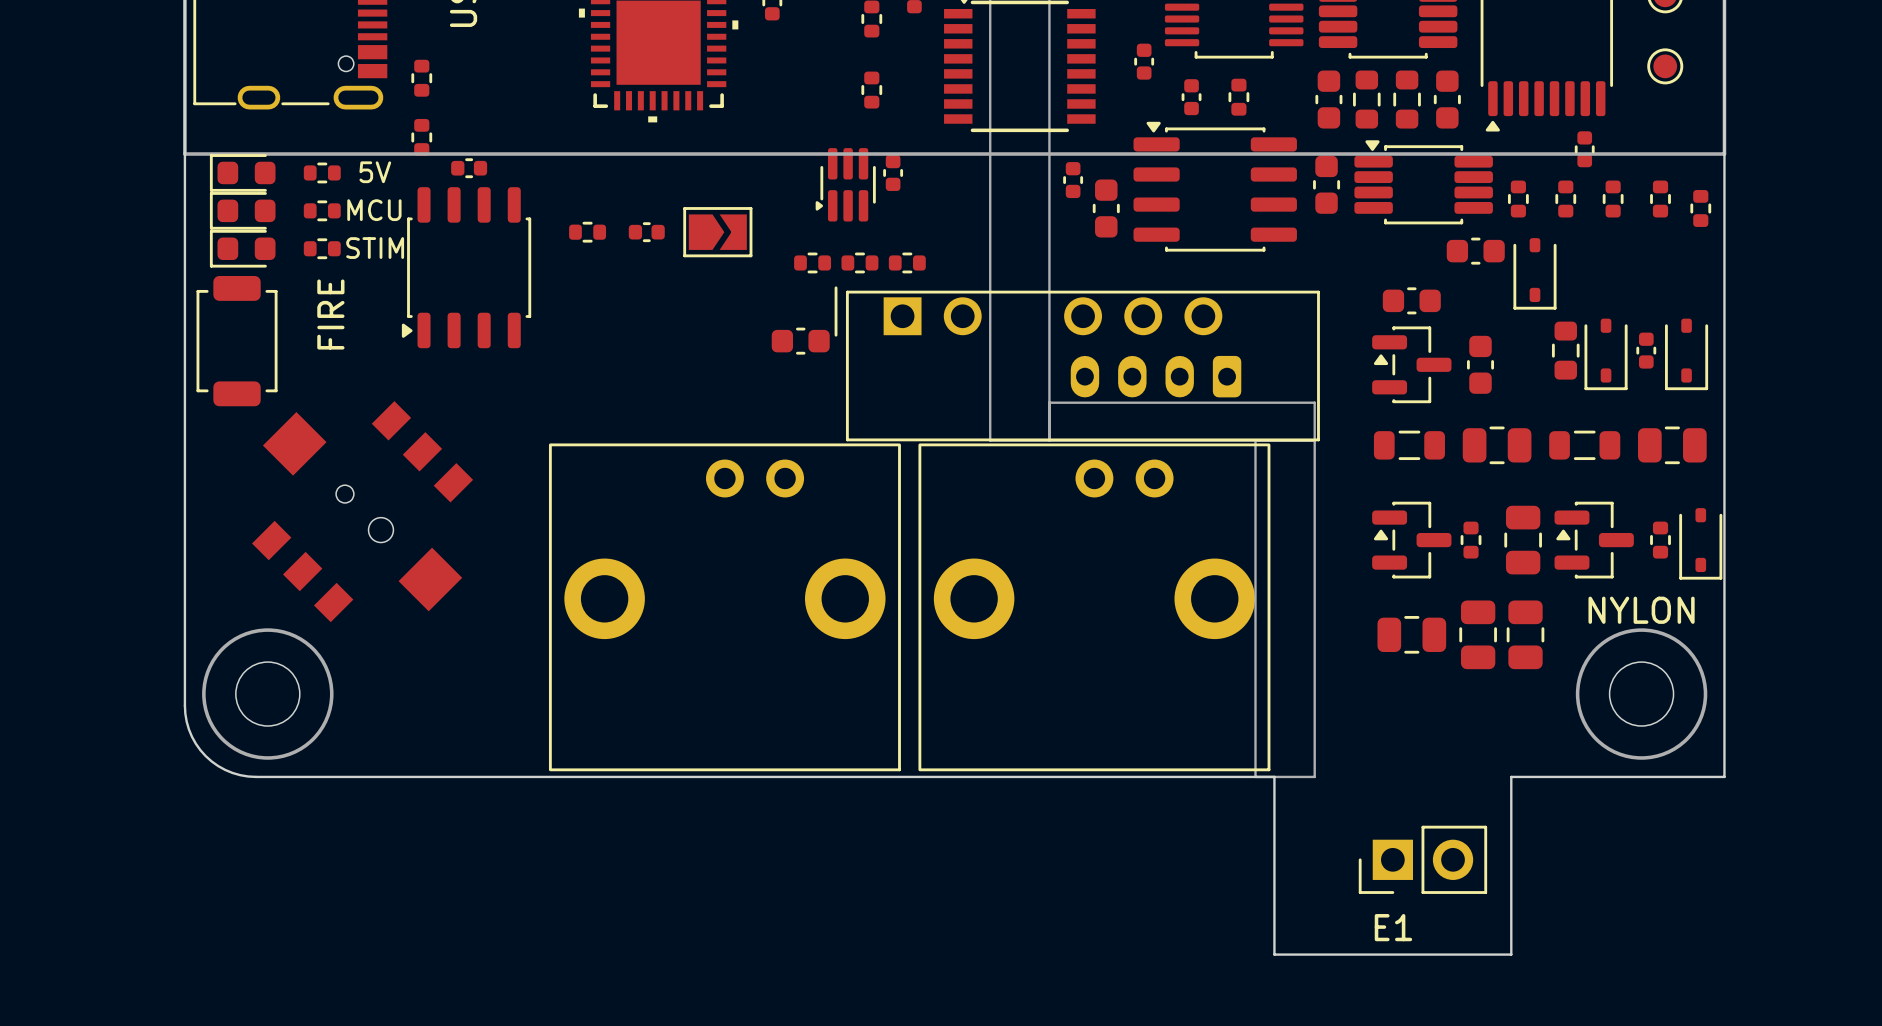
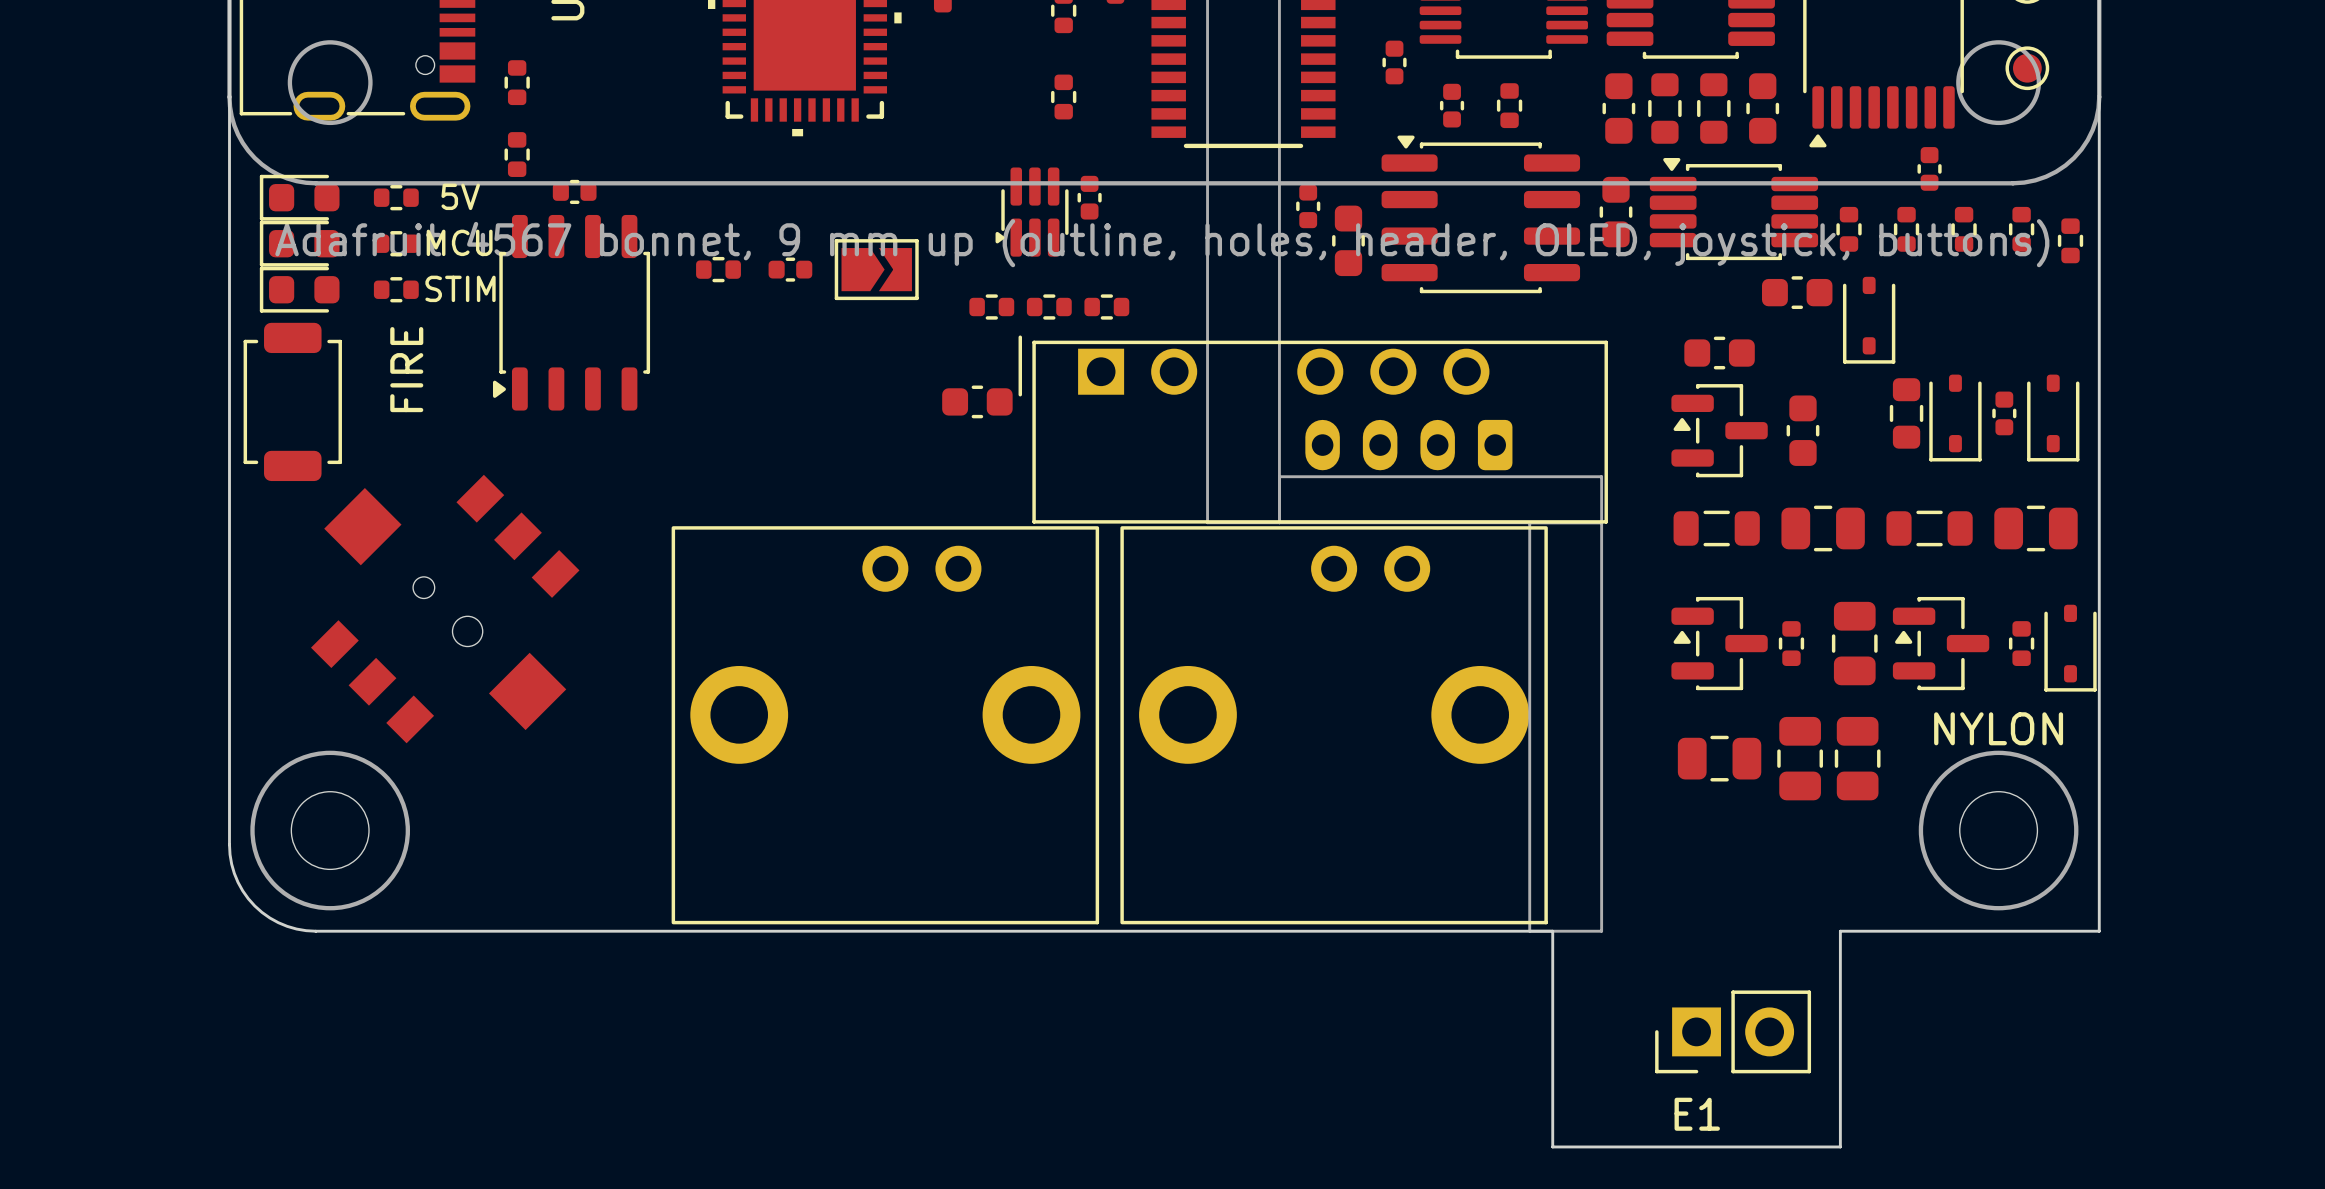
drawing: none -> [287, 40, 373, 126]
drawing: none -> [1956, 40, 2042, 126]
line: (184, 90) (184, 154) (1724, 154) (1724, 90) -> (229, 97) (231, 116) (238, 134) (254, 158) (269, 170) (287, 178) (315, 183) (2012, 183) (2046, 176) (2074, 158) (2092, 130) (2099, 97)
text: none -> Adafruit 4567 bonnet, 9 mm up (outline, holes, header, OLED, joystick, buttons) (1162, 243)

